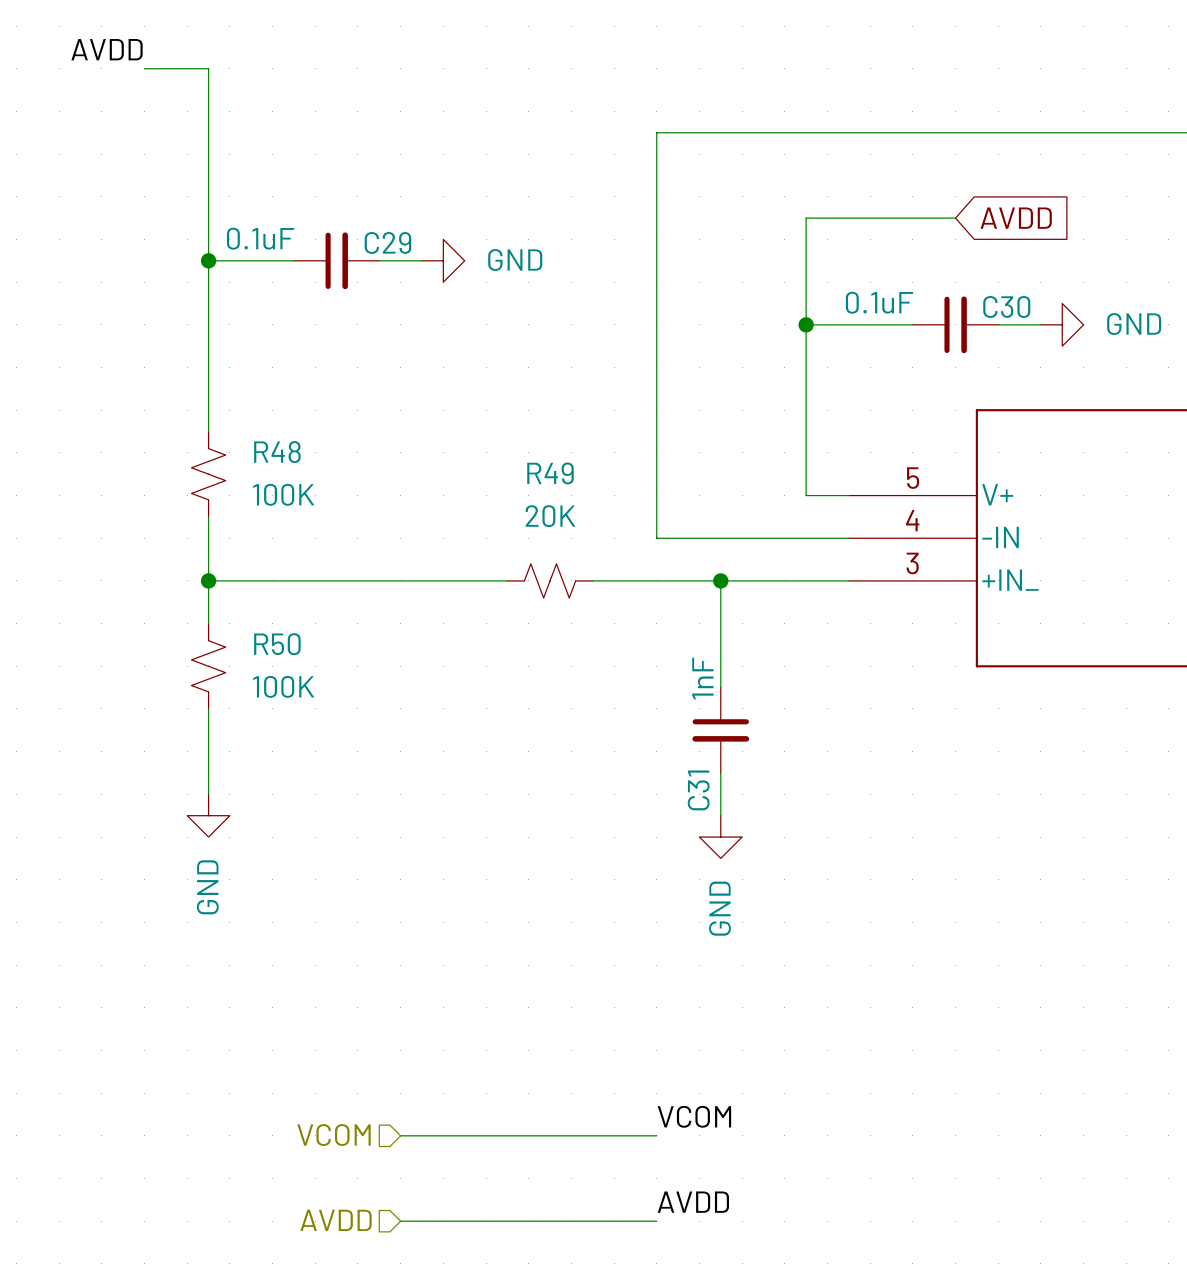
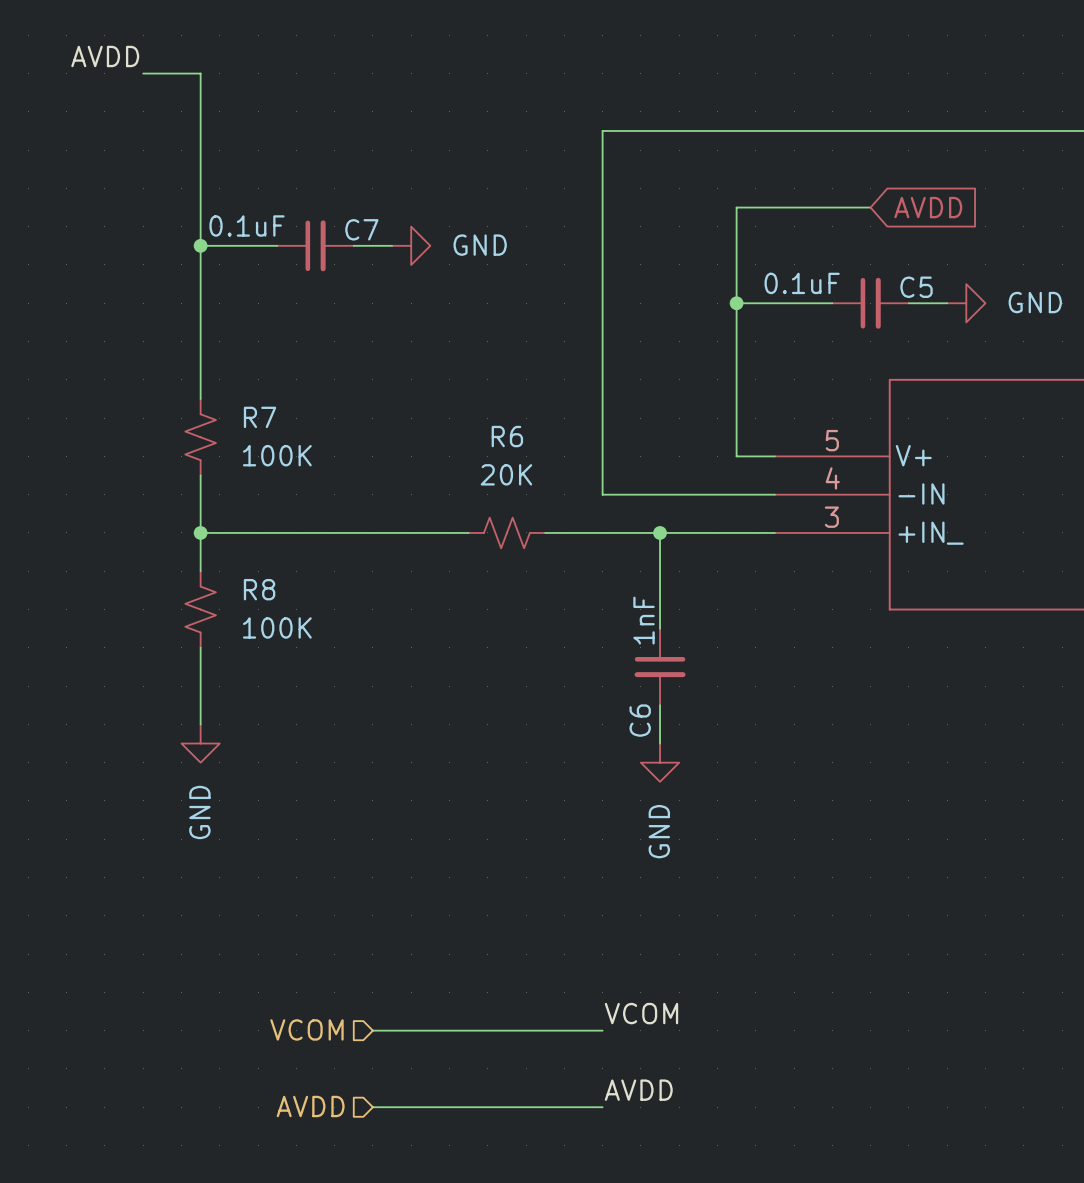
C29 name: C29 (387, 242) -> C7 (361, 229)
C30 name: C30 (1006, 306) -> C5 (916, 287)
R48 name: R48 (277, 452) -> R7 (260, 417)
R49 name: R49 (550, 473) -> R6 (507, 436)
R50 name: R50 (277, 644) -> R8 (259, 589)
C31 name: C31 (698, 790) -> C6 (640, 720)

